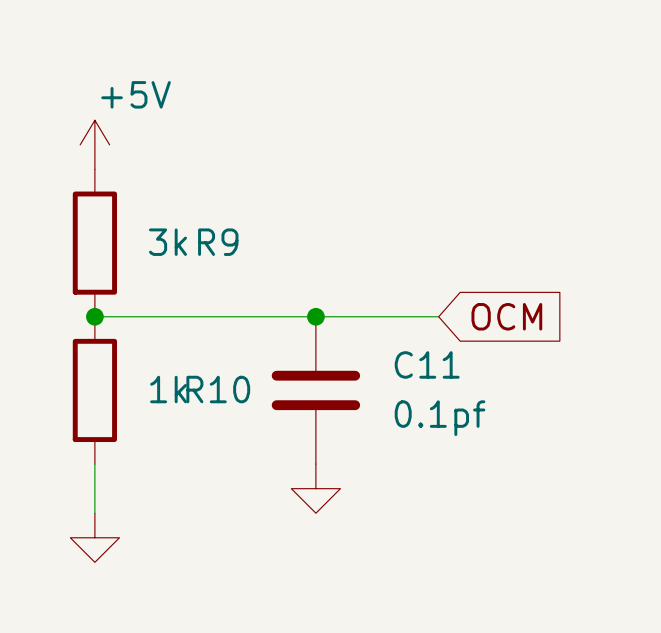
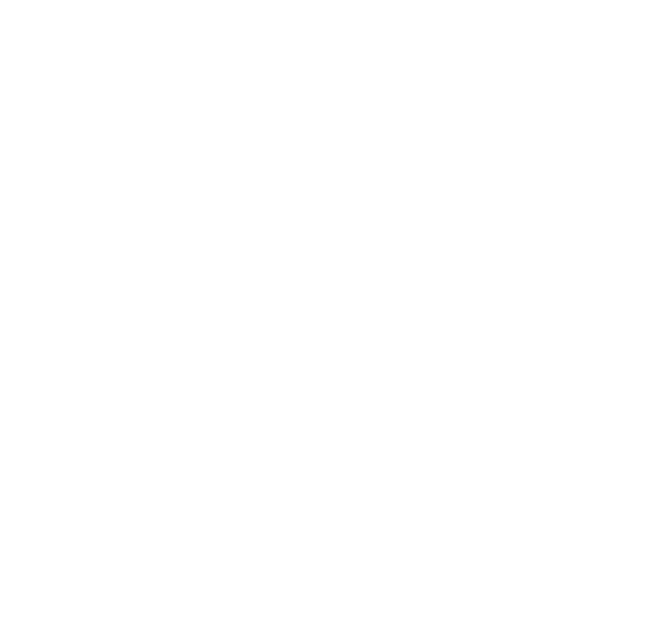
power symbol: +5V (94, 144) -> none
R9: 3k (94, 243) -> none
wire: (94, 316) (438, 316) -> none
junction: (94, 316) -> none
junction: (315, 316) -> none
global label: OCM (506, 316) -> none
R10: 1k (94, 390) -> none
C11: 0.1pf (315, 390) -> none
wire: (94, 464) (94, 513) -> none
power symbol: (315, 488) -> none
power symbol: (94, 537) -> none

